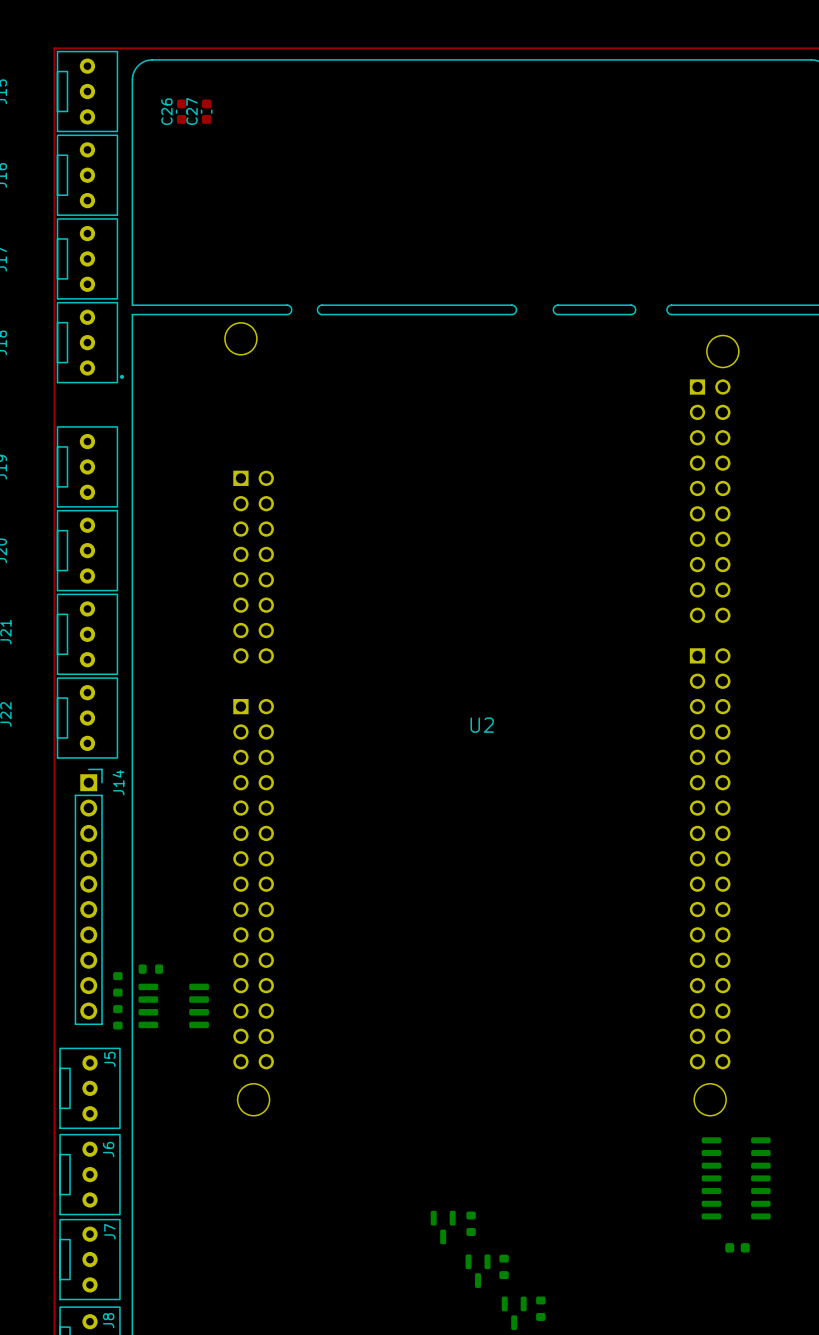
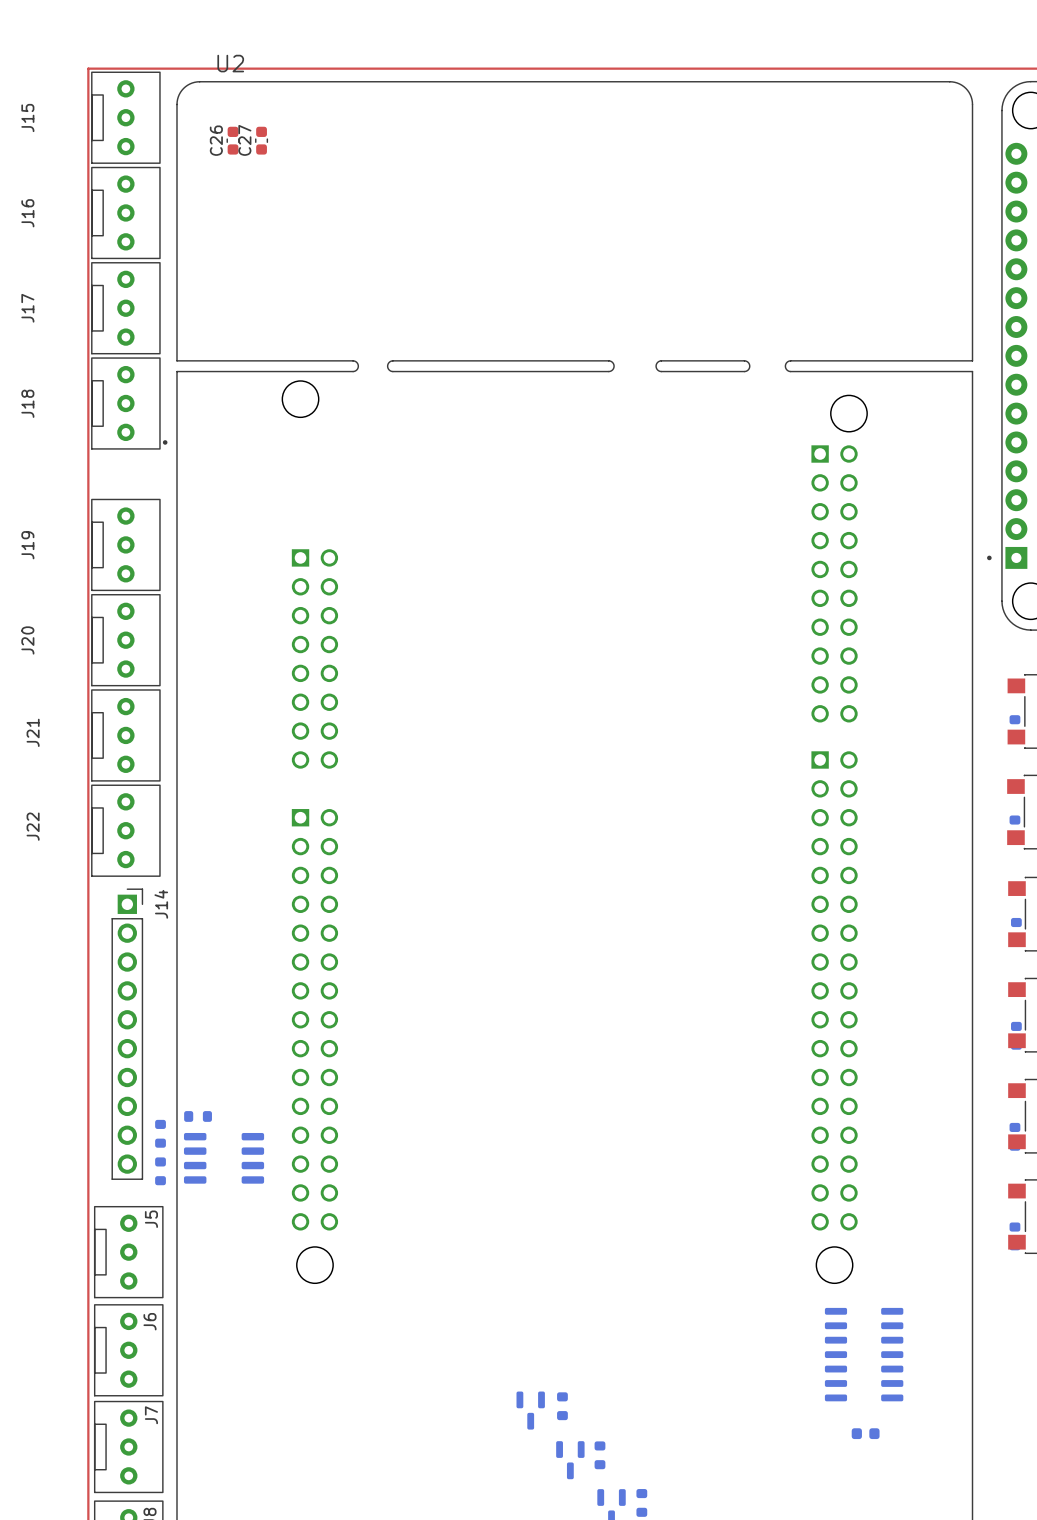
U2 name position: U2 (482, 725) -> U2 (230, 63)

